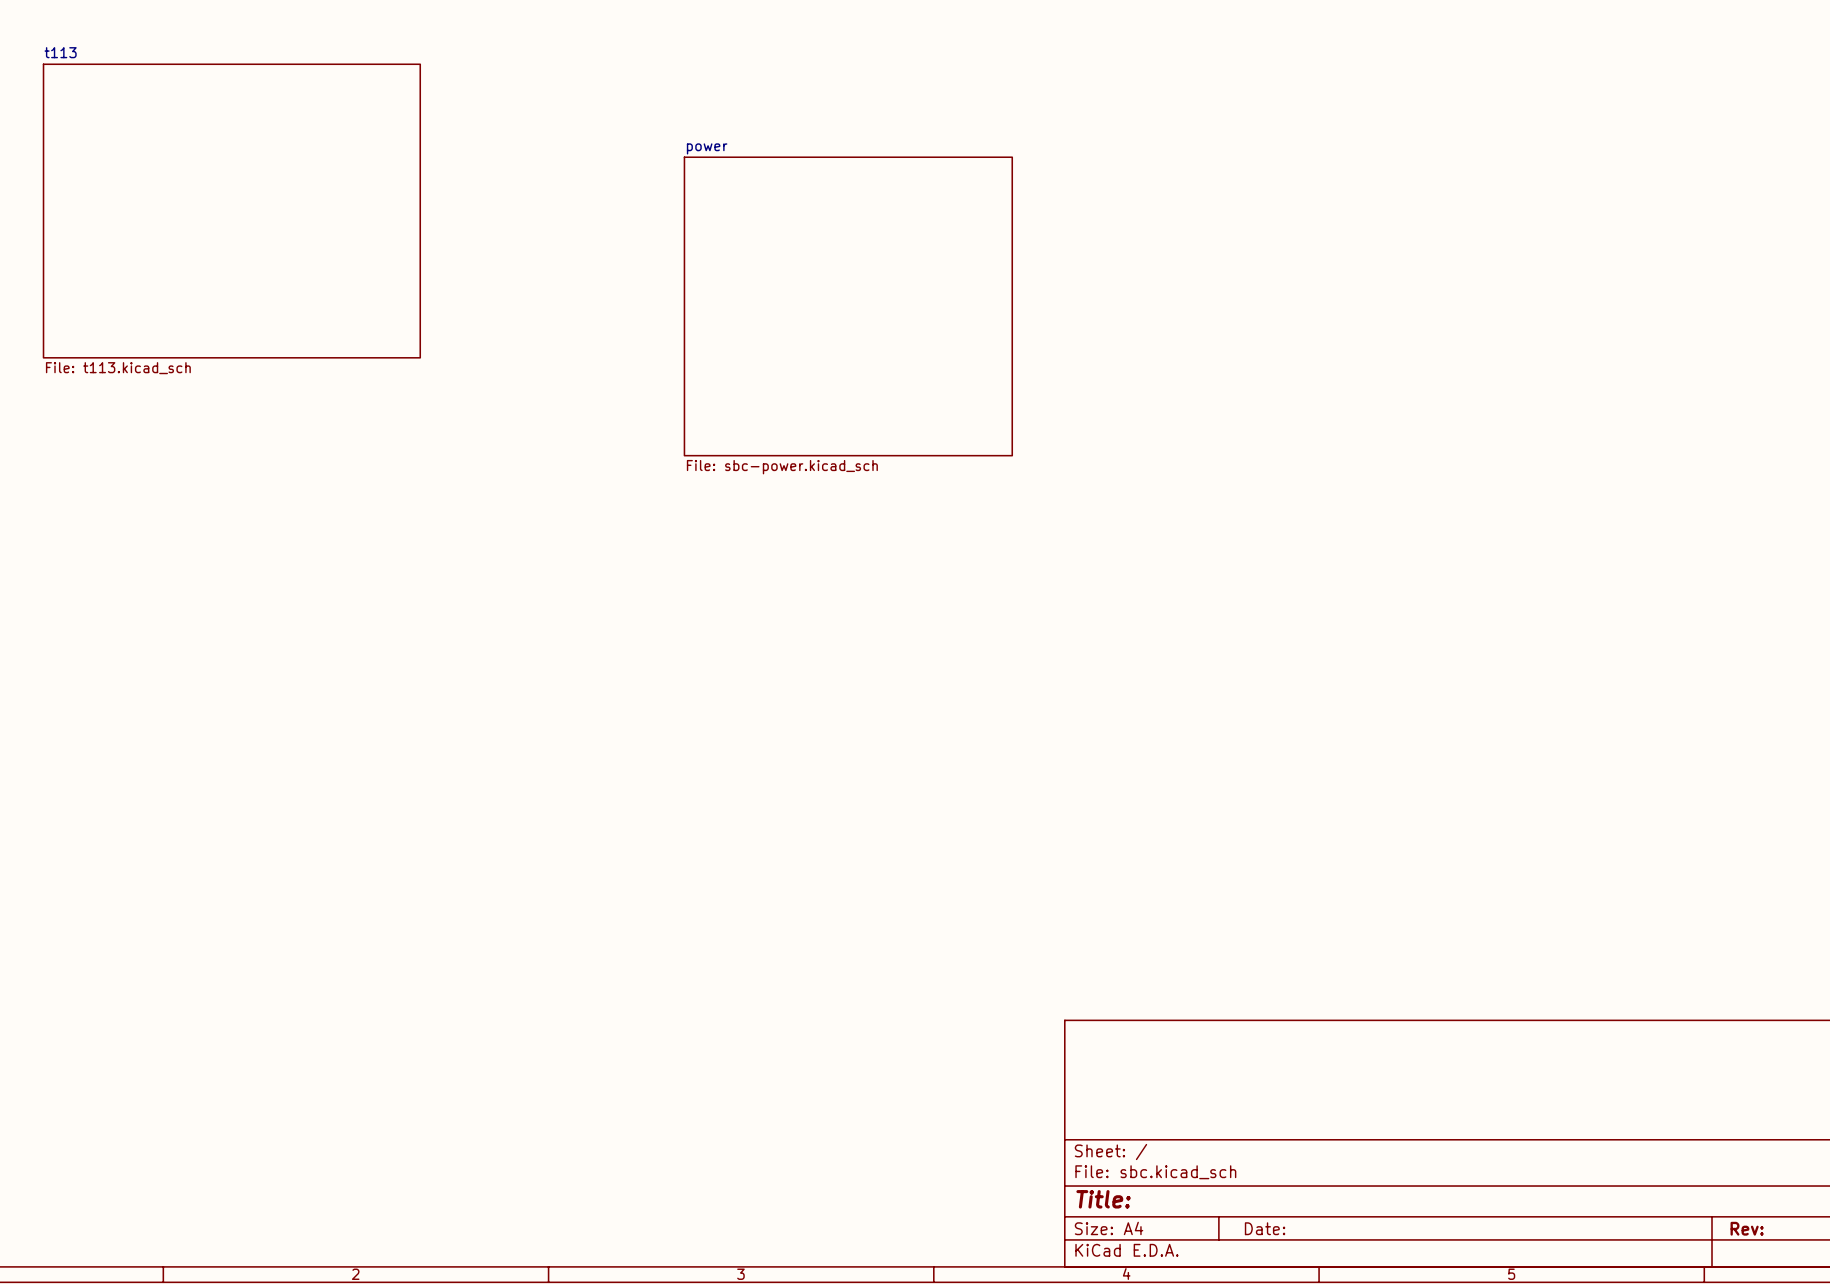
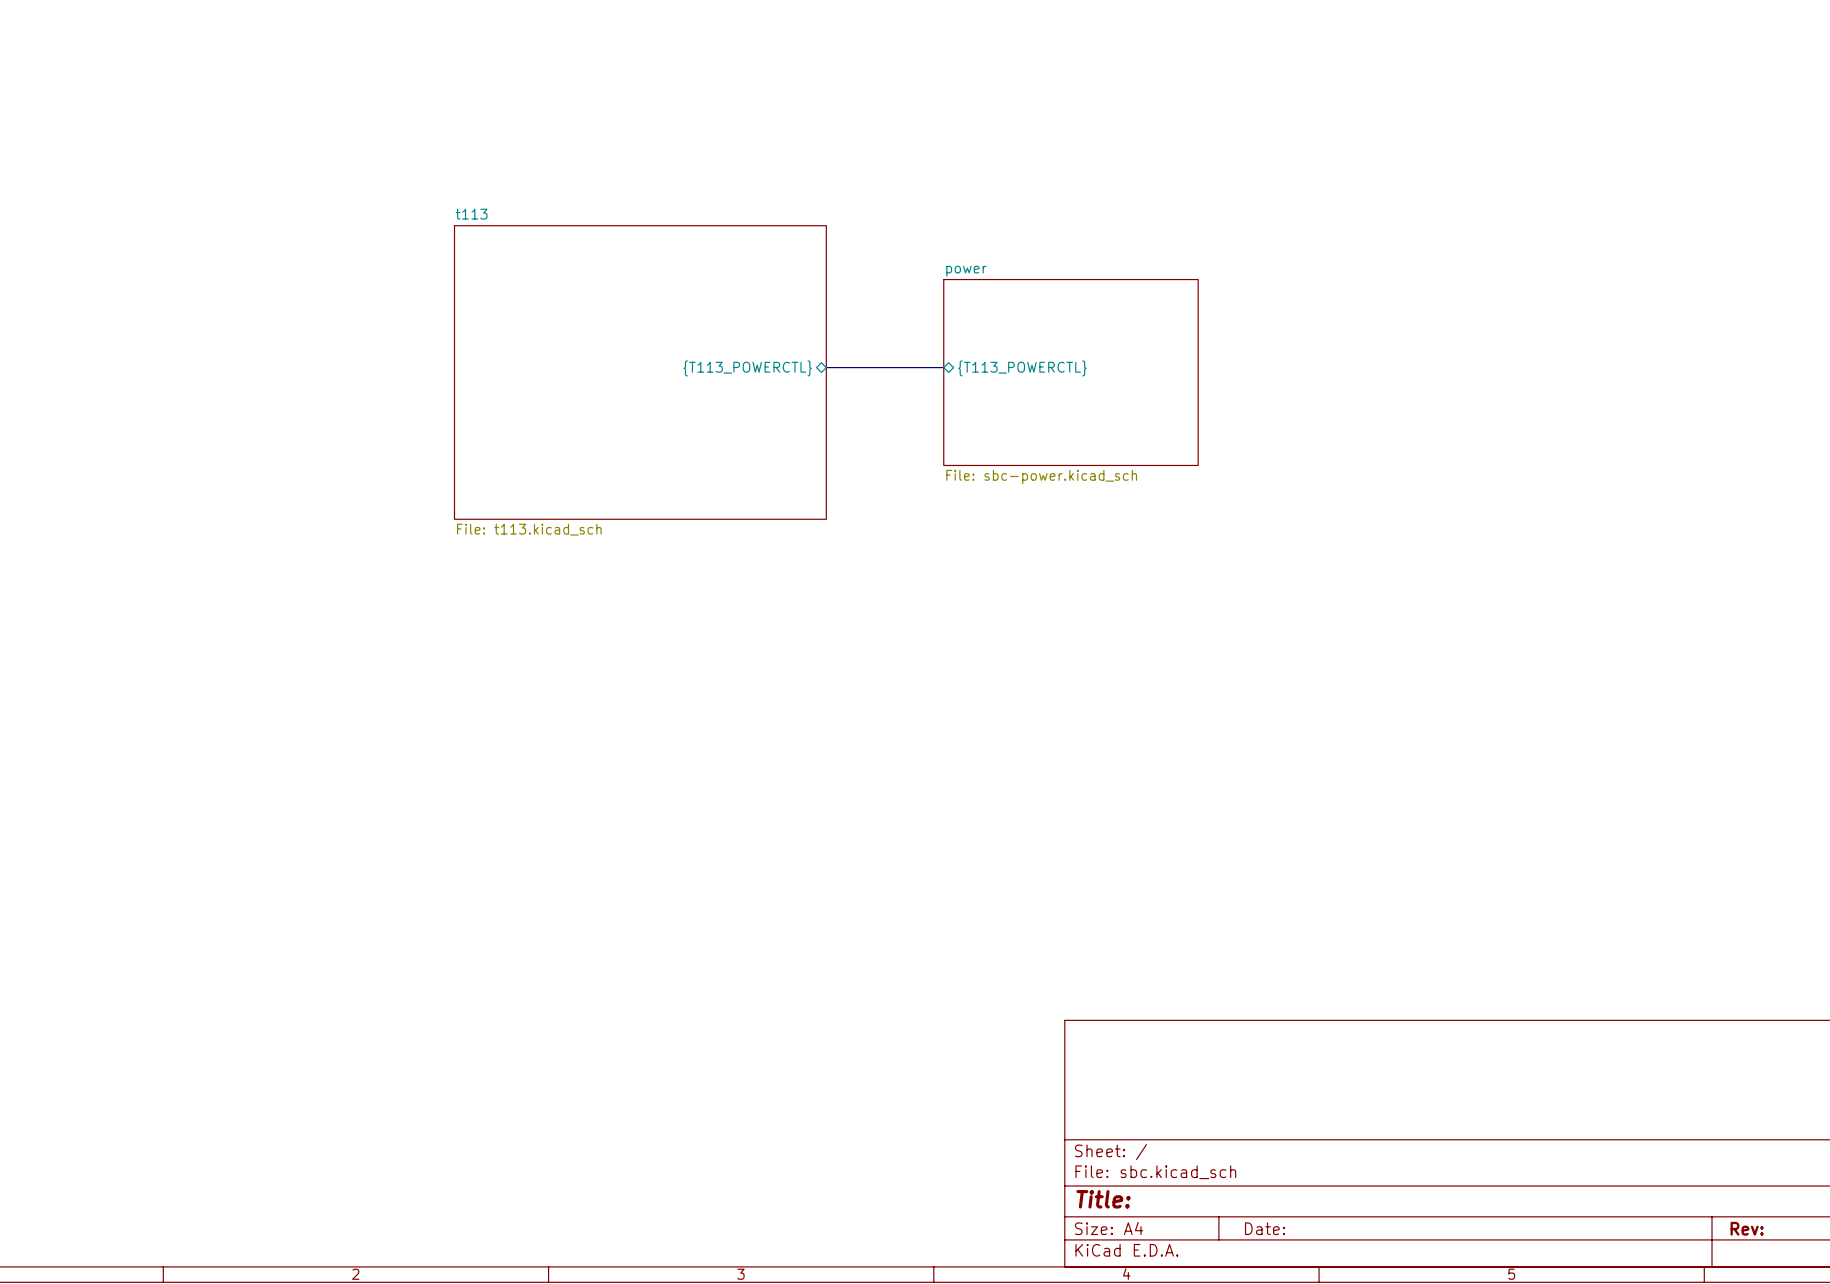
sheet t113 shape: [42, 63, 421, 359] -> [453, 225, 827, 520]
sheet power: File: sbc-power.kicad_sch (848, 306) -> none
bus: none -> (826, 367) (943, 367)
sheet pin: none -> {T113_POWERCTL} (747, 368)
sheet pin: none -> {T113_POWERCTL} (1022, 368)
sheet power: none -> File: sbc-power.kicad_sch (1070, 372)

